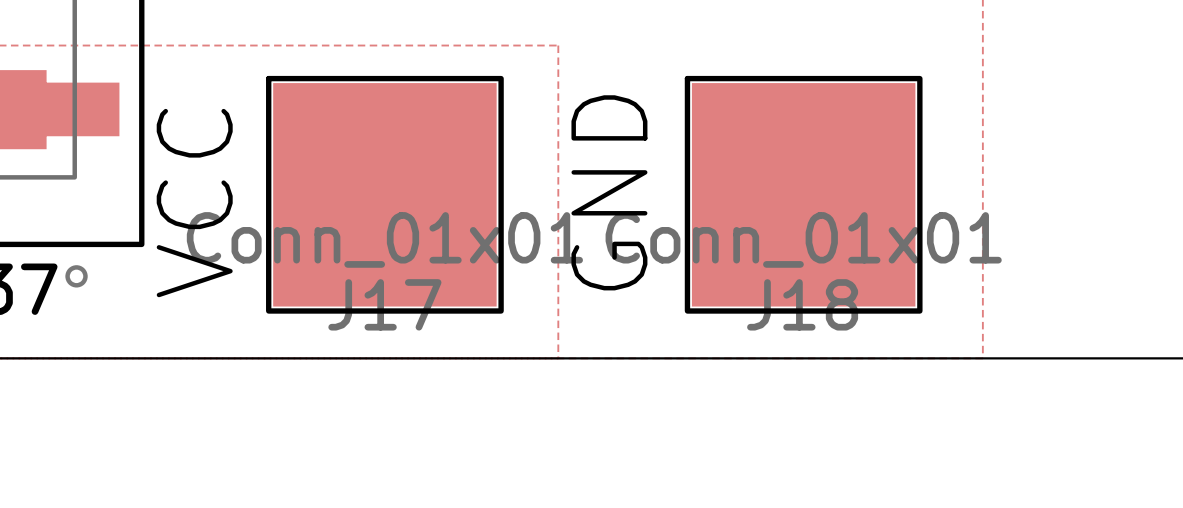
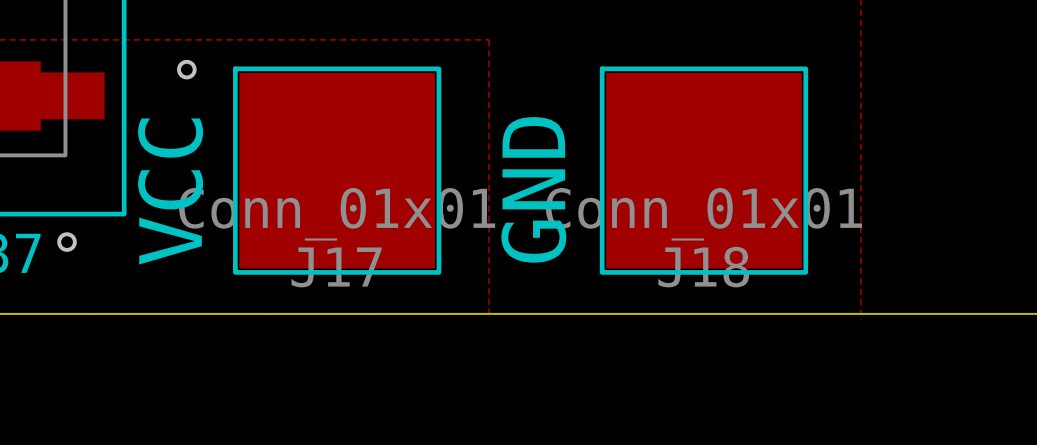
via: none -> (186, 69)

